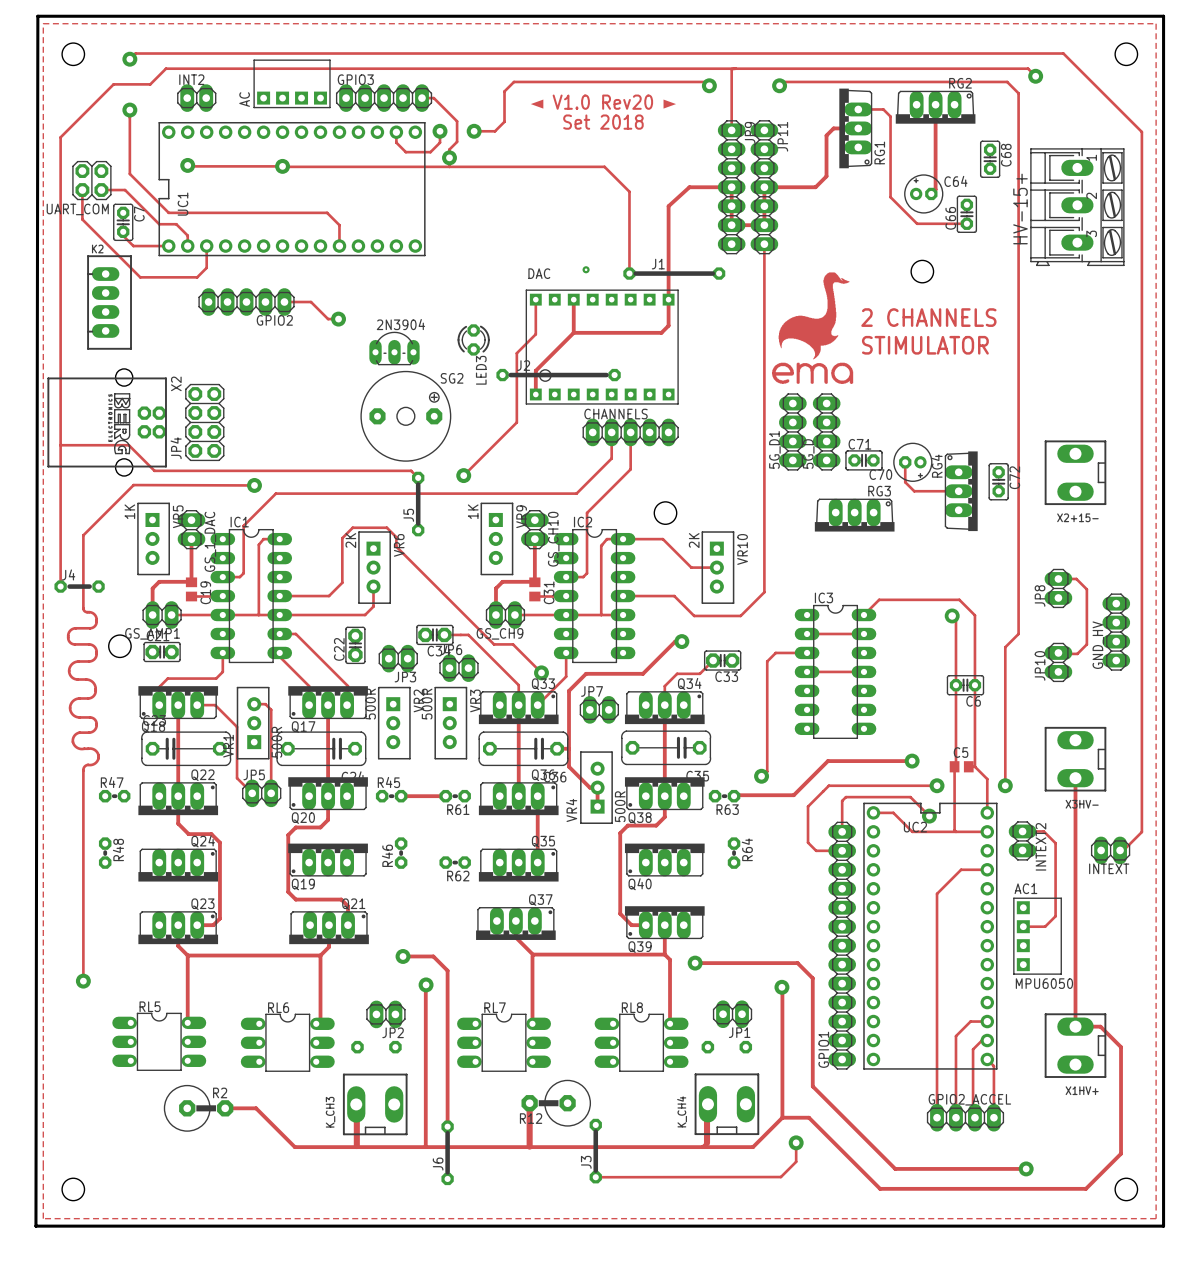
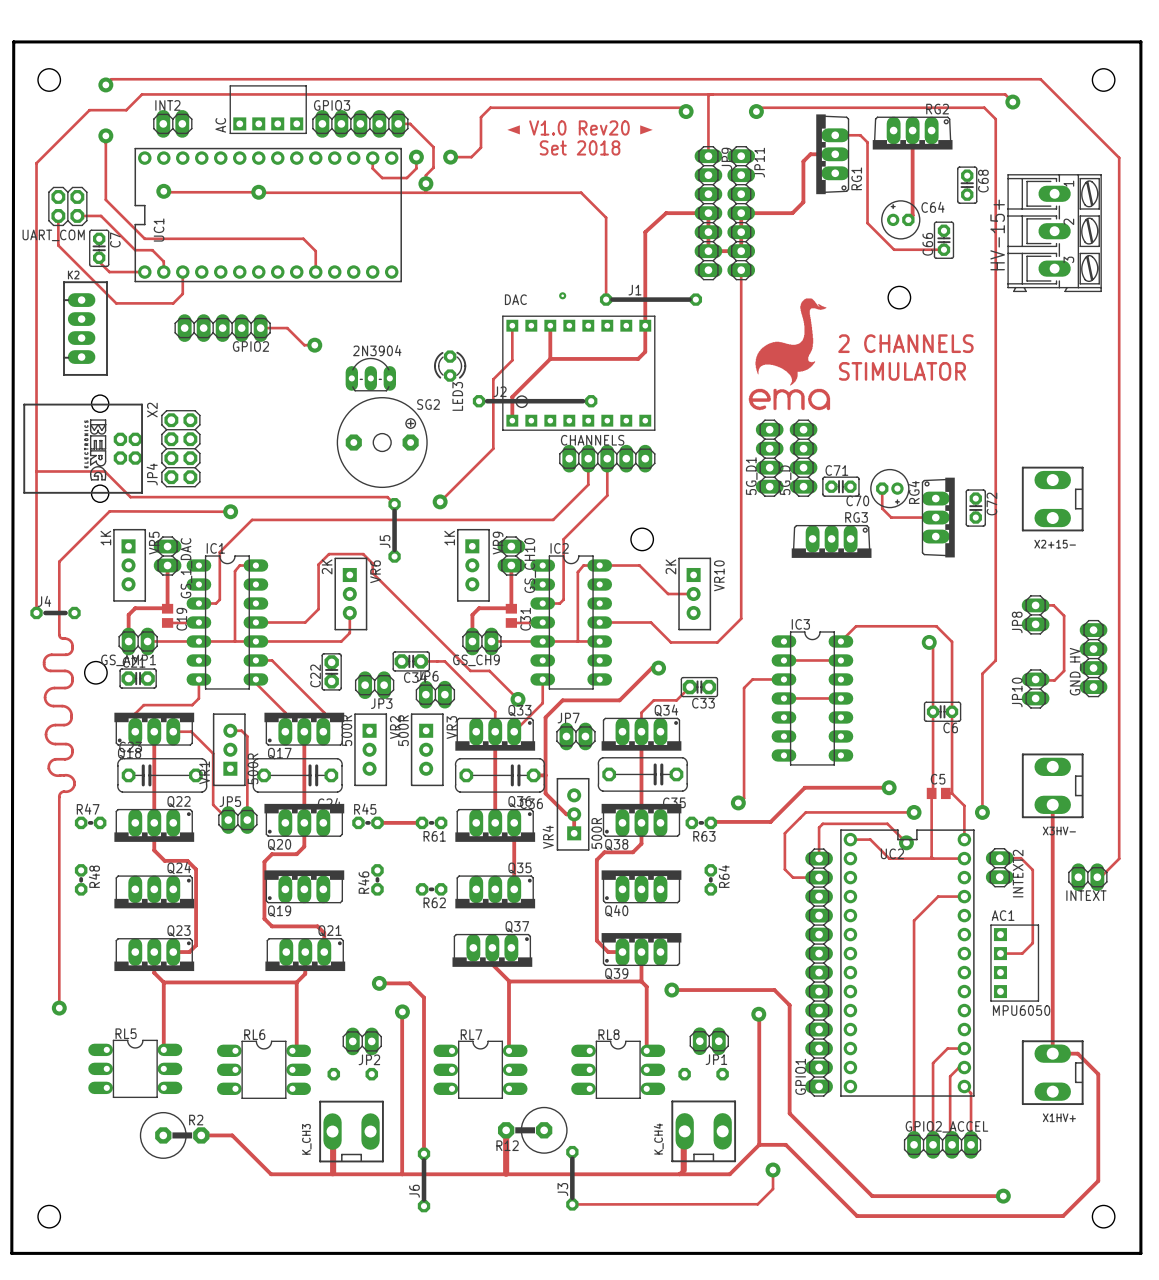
zone outline: (43, 23) (1156, 23) (1156, 1218) (43, 1218) (43, 23) -> none

